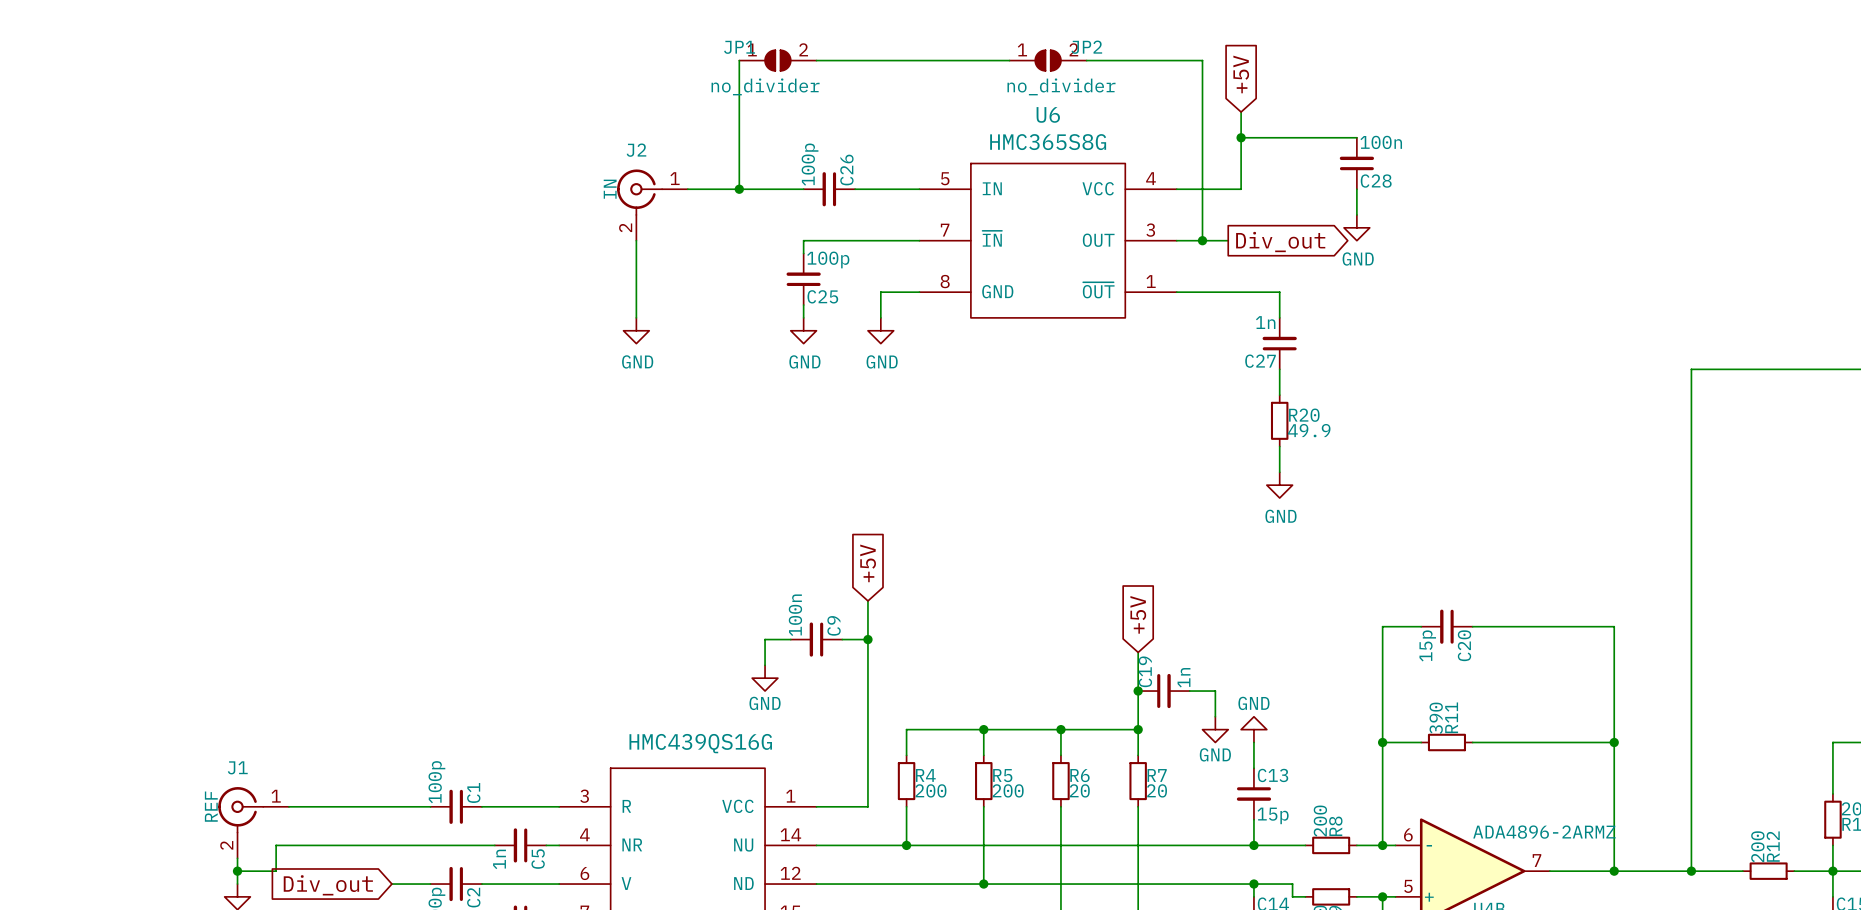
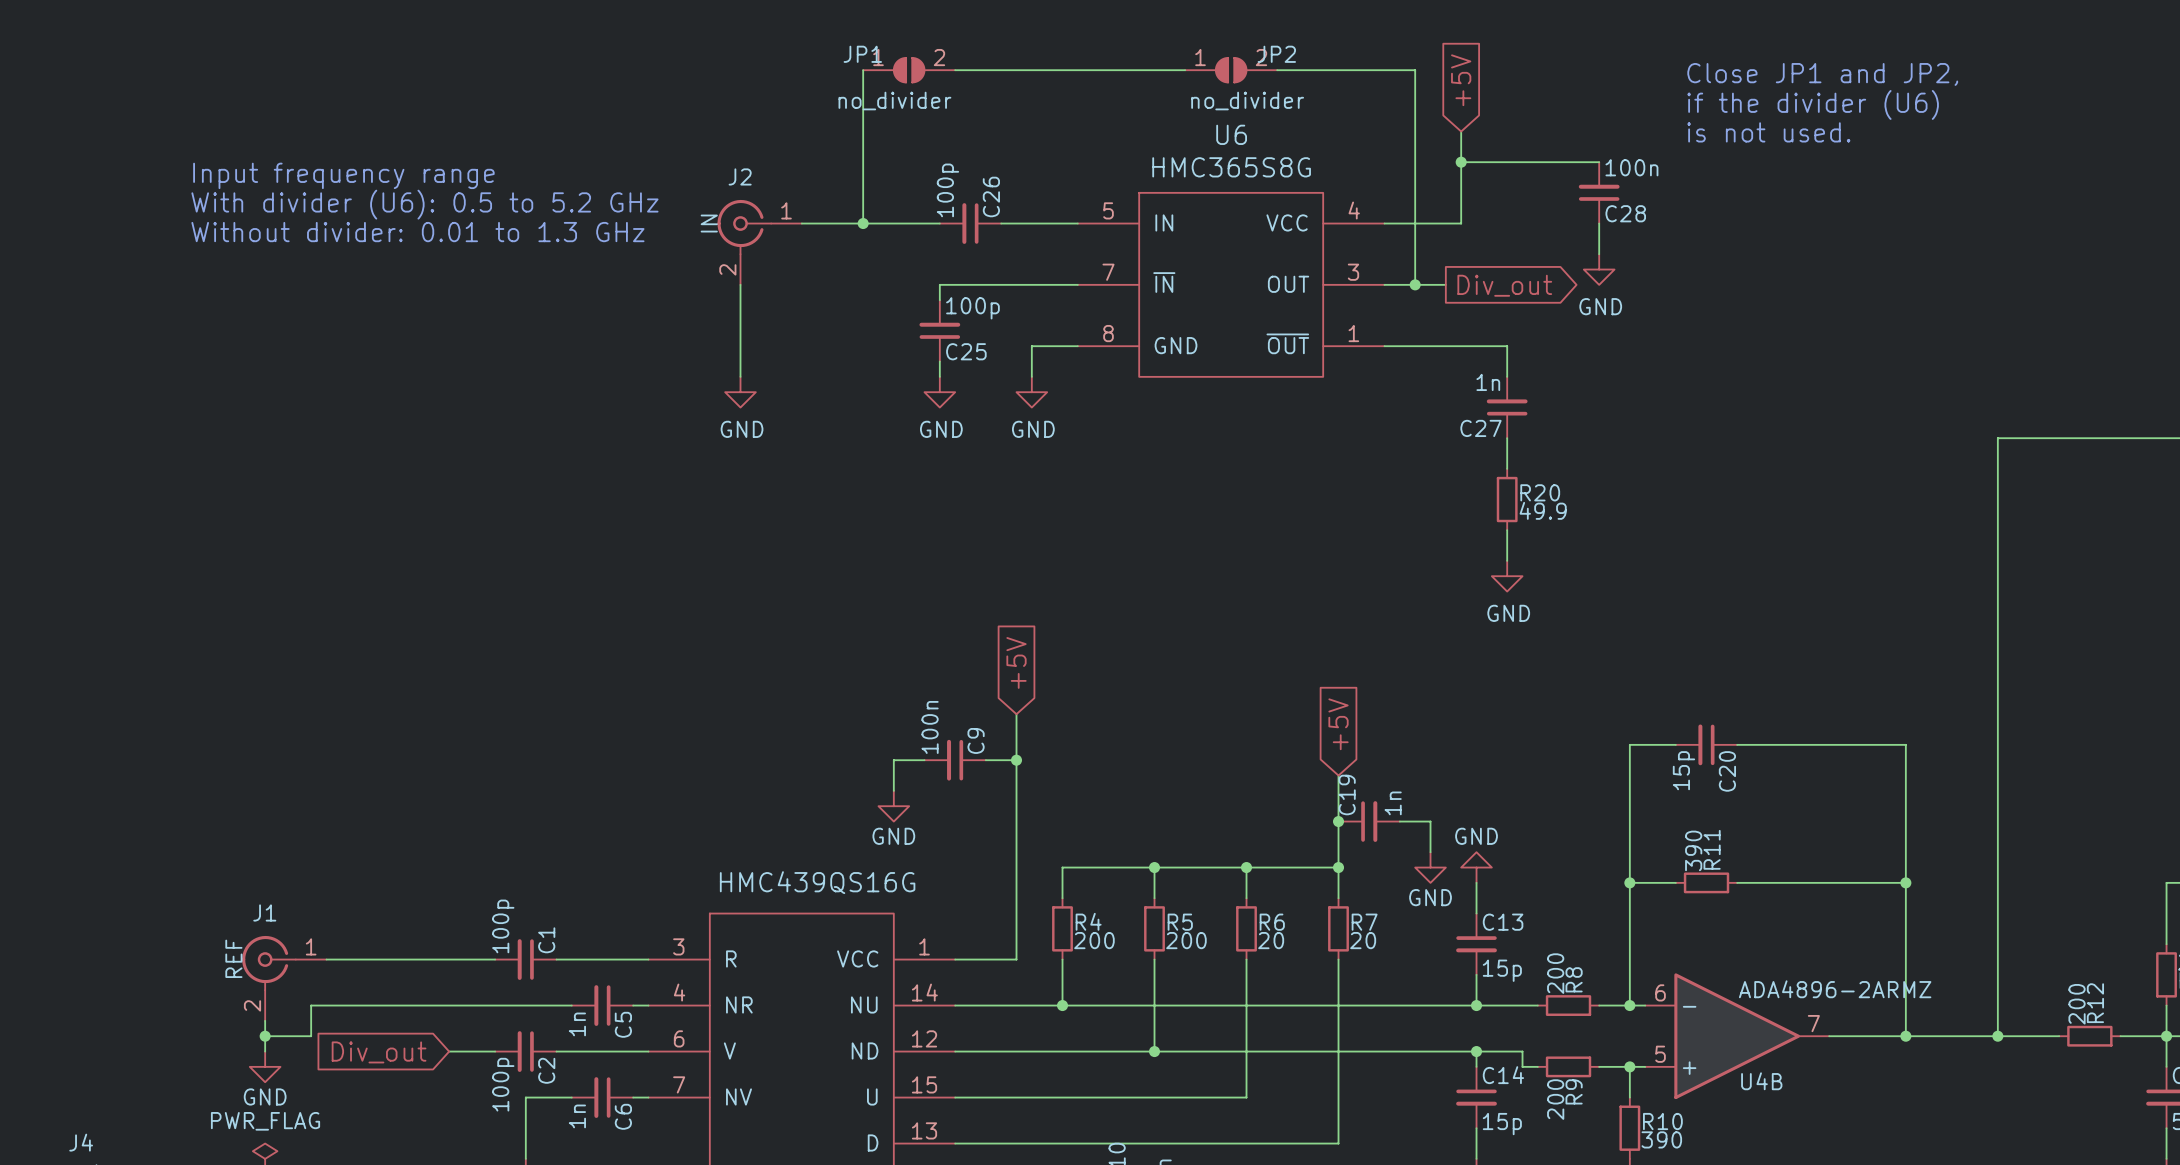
text: none -> Close JP1 and JP2, (1822, 74)
text: none -> if the divider (U6) (1813, 104)
text: none -> is not used. (1768, 132)
text: none -> Input frequency range (343, 175)
text: none -> With divider (U6): 0.5 to 5.2 GHz (424, 204)
text: none -> Without divider: 0.01 to 1.3 GHz (417, 232)

